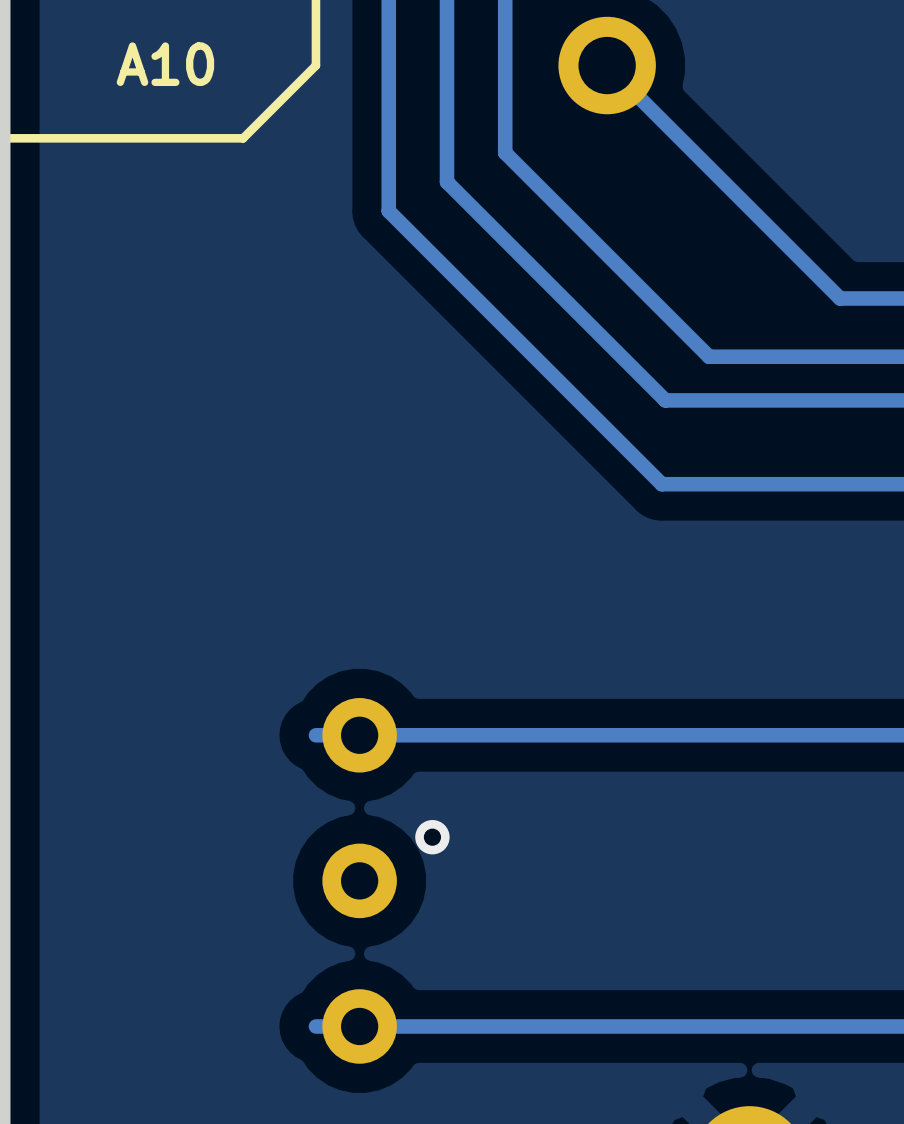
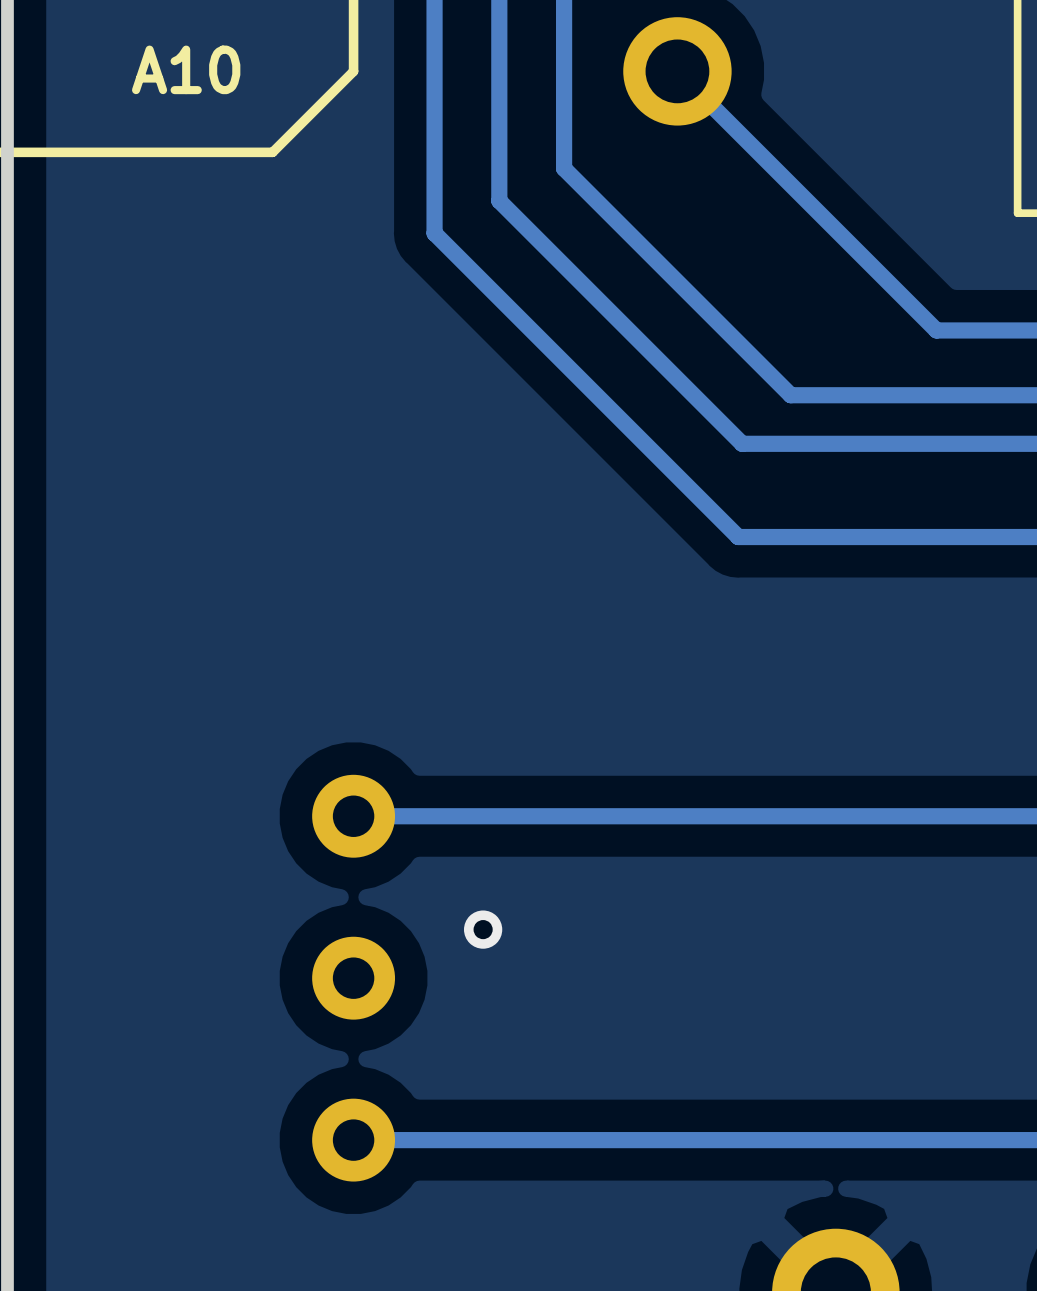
part position: (359, 880) -> (353, 978)

